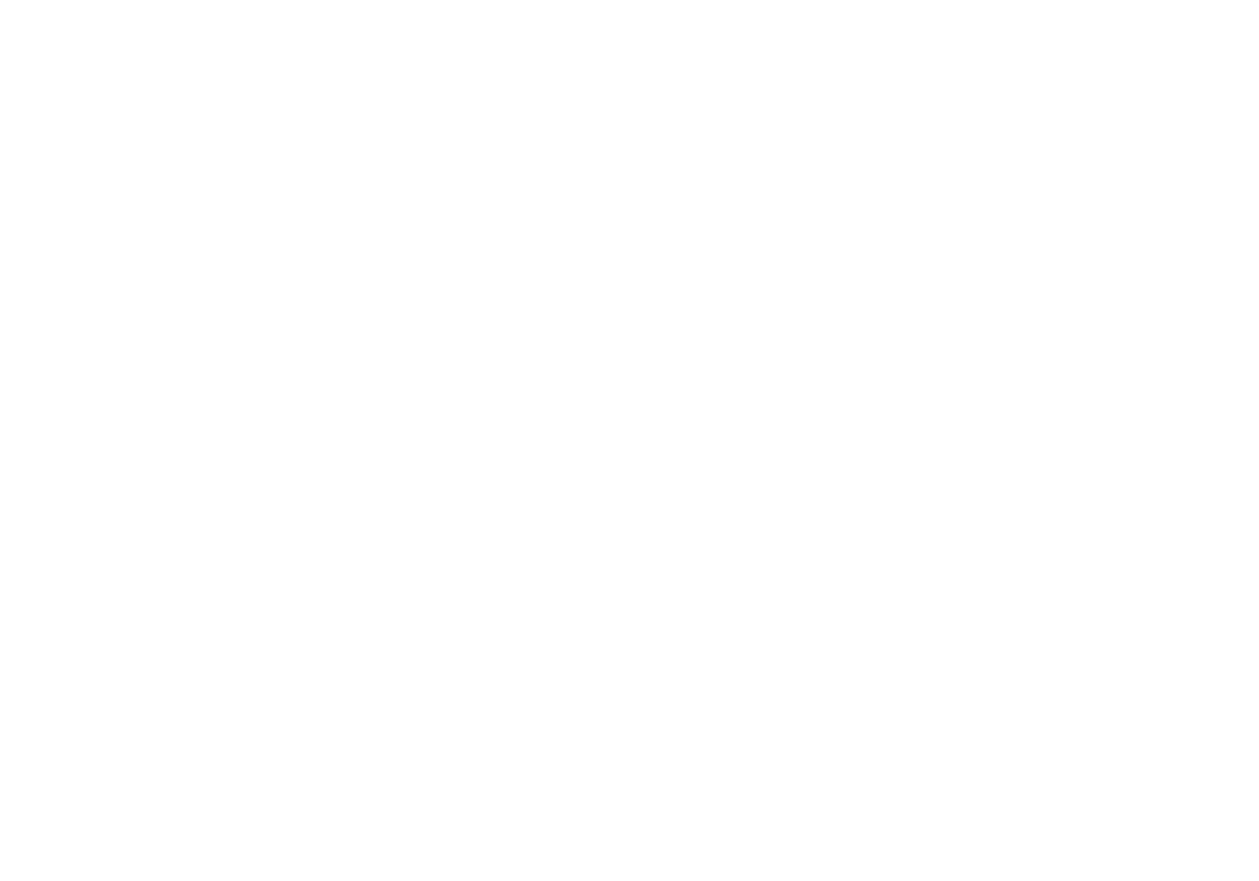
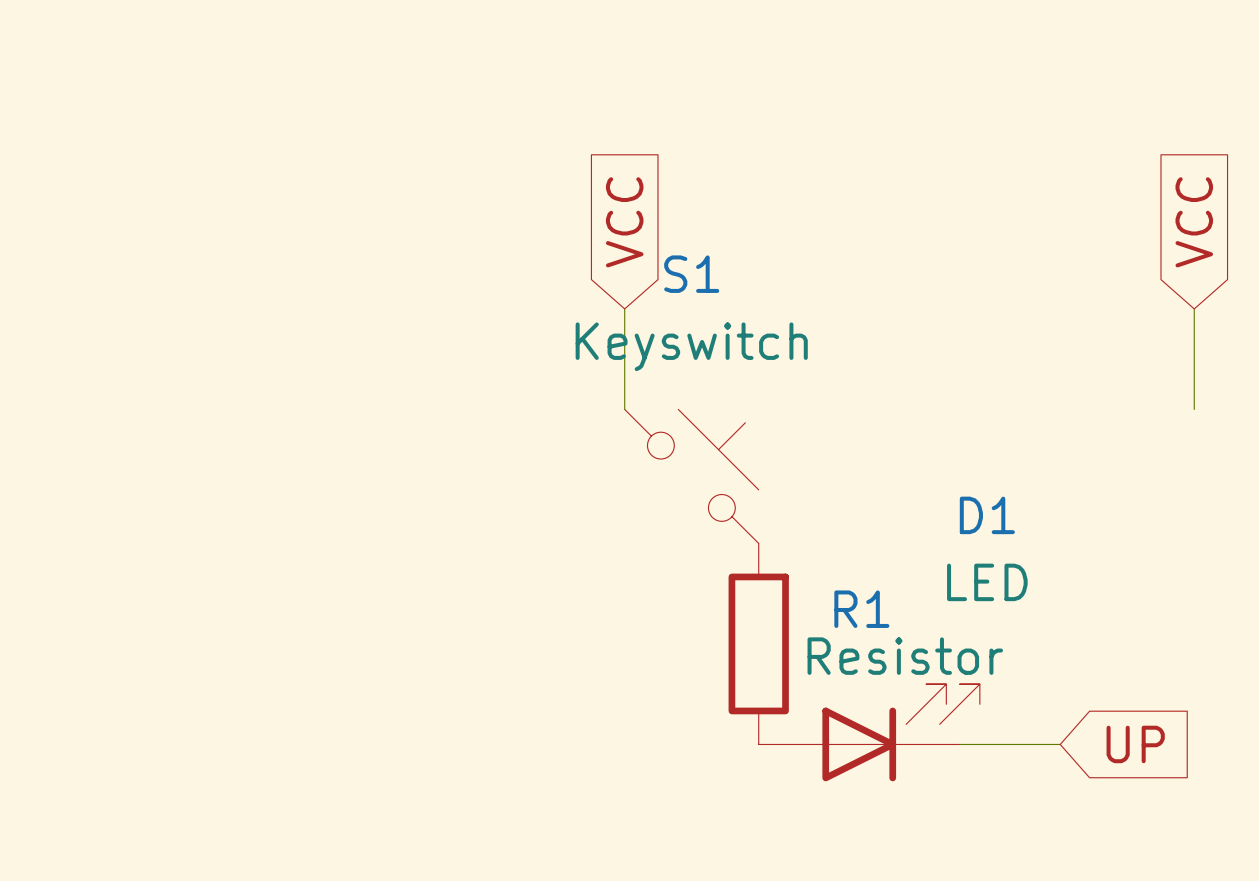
global label: none -> VCC (624, 222)
global label: none -> VCC (1194, 222)
wire: none -> (624, 308) (624, 409)
wire: none -> (1194, 308) (1194, 409)
S1: none -> Keyswitch (691, 476)
R1: none -> Resistor (758, 643)
D1: none -> LED (869, 732)
wire: none -> (959, 744) (1060, 744)
global label: none -> UP (1135, 744)

